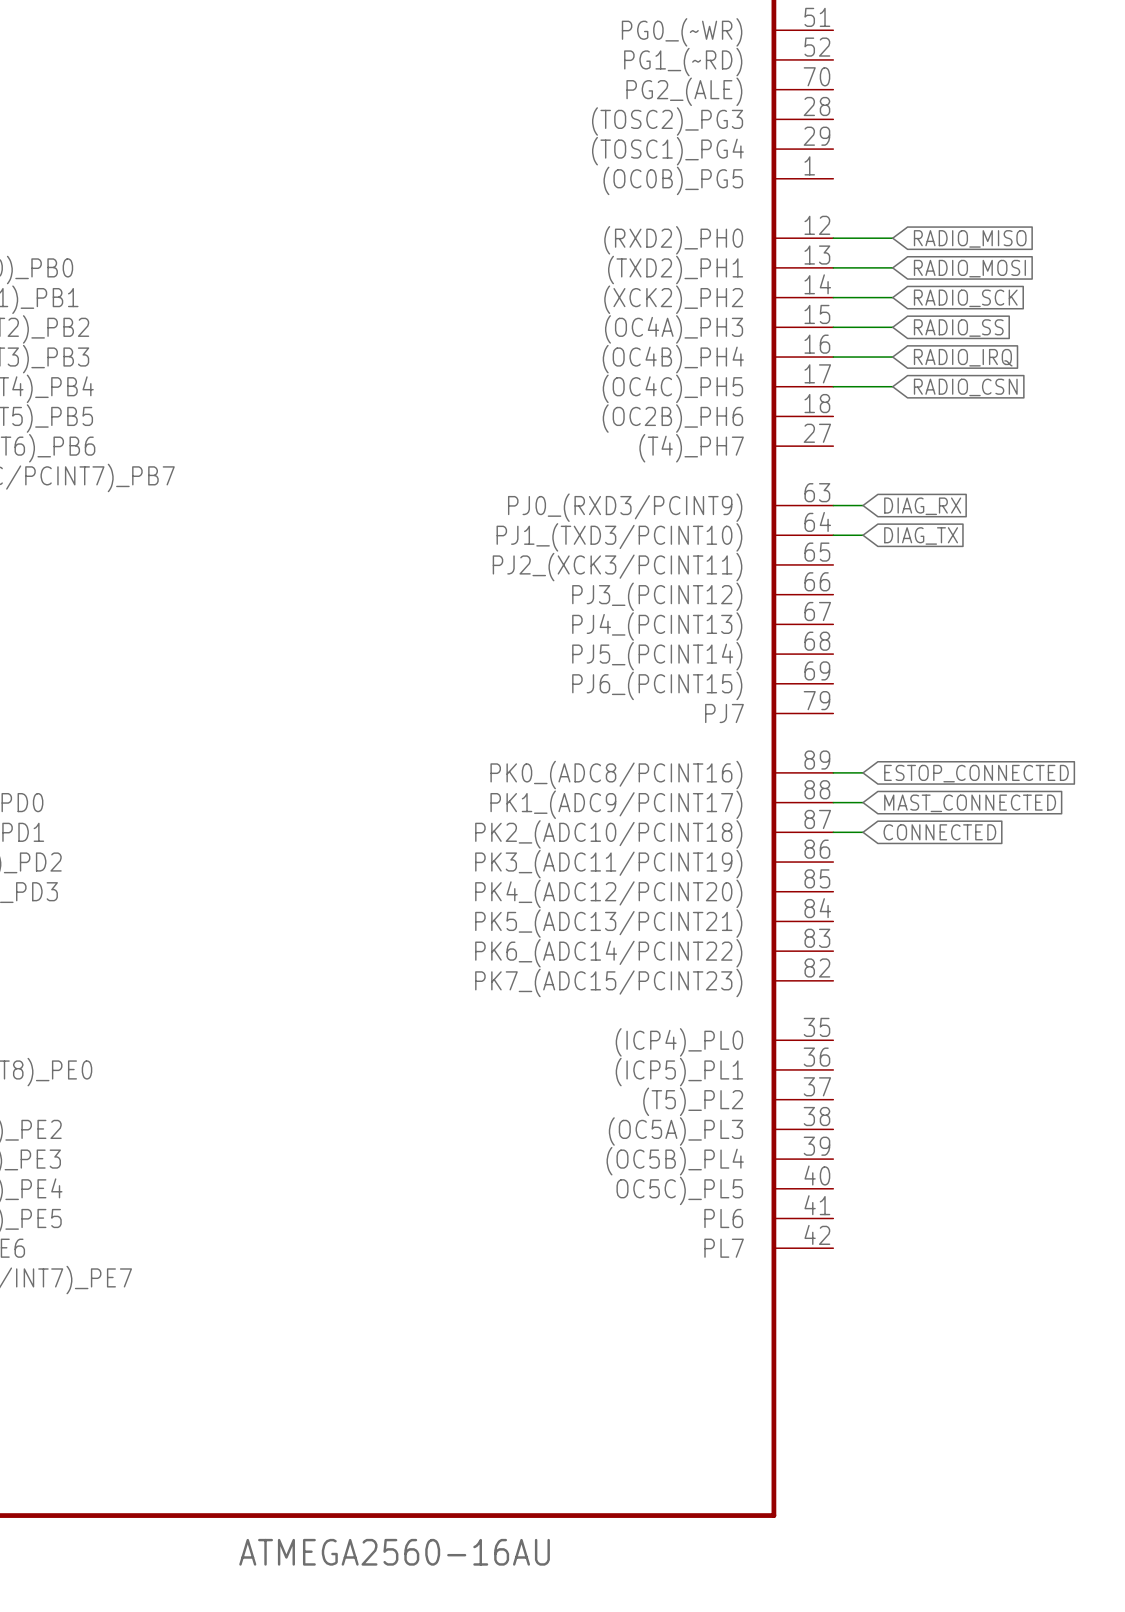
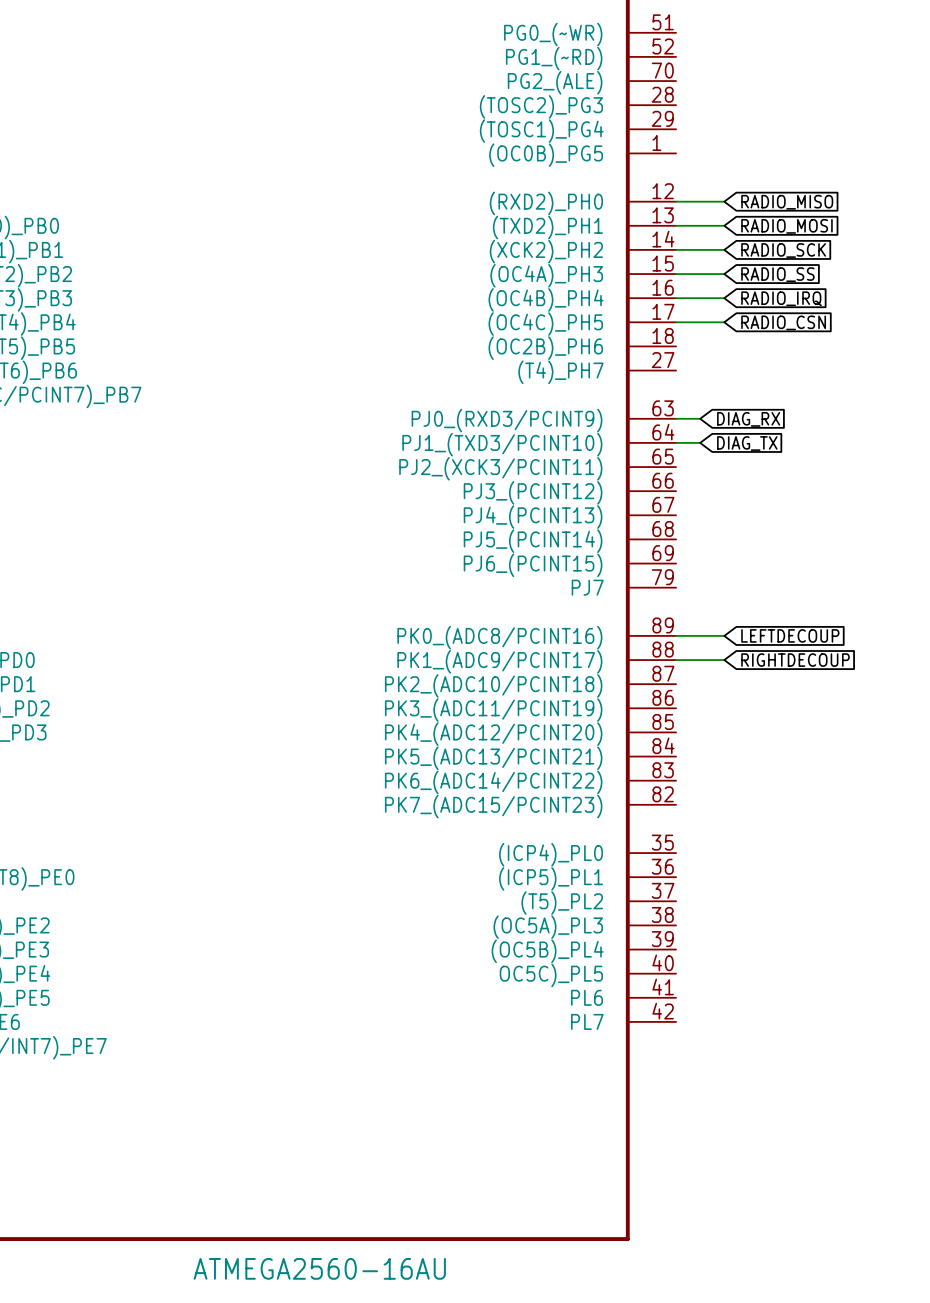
wire: none -> (700, 635) (724, 635)
global label: none -> LEFTDECOUP (790, 635)
global label: ESTOP_CONNECTED (976, 773) -> none
global label: none -> RIGHTDECOUP (795, 660)
global label: MAST_CONNECTED (970, 803) -> none
wire: (833, 832) (863, 832) -> (700, 660) (724, 660)
global label: CONNECTED (939, 832) -> none

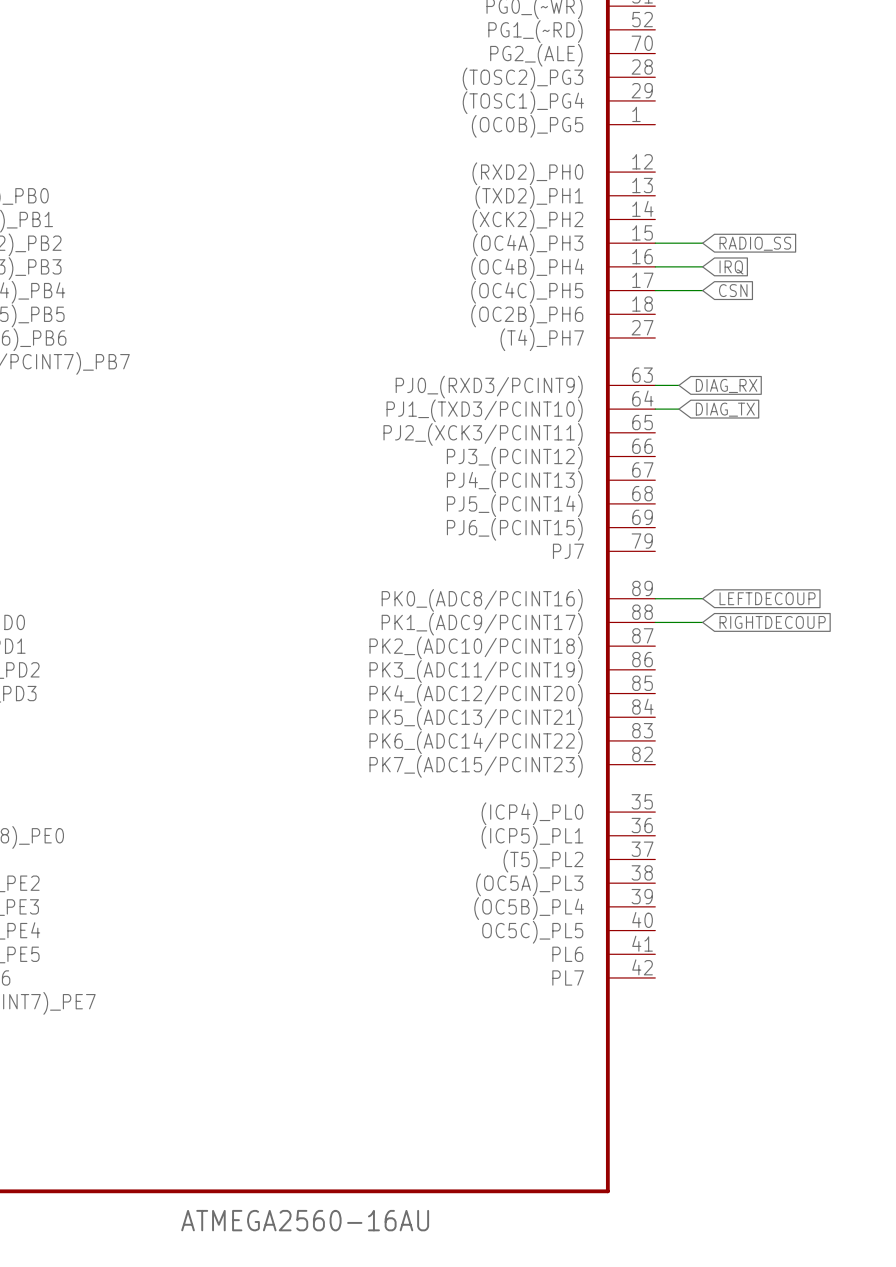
wire: (676, 201) (724, 201) -> none
global label: RADIO_MISO (787, 202) -> none
wire: (676, 225) (724, 225) -> none
global label: RADIO_MOSI (786, 226) -> none
wire: (676, 249) (724, 249) -> none
global label: RADIO_SCK (783, 250) -> none
global label: RADIO_IRQ (781, 298) -> IRQ (731, 267)
global label: RADIO_CSN (783, 322) -> CSN (733, 290)

